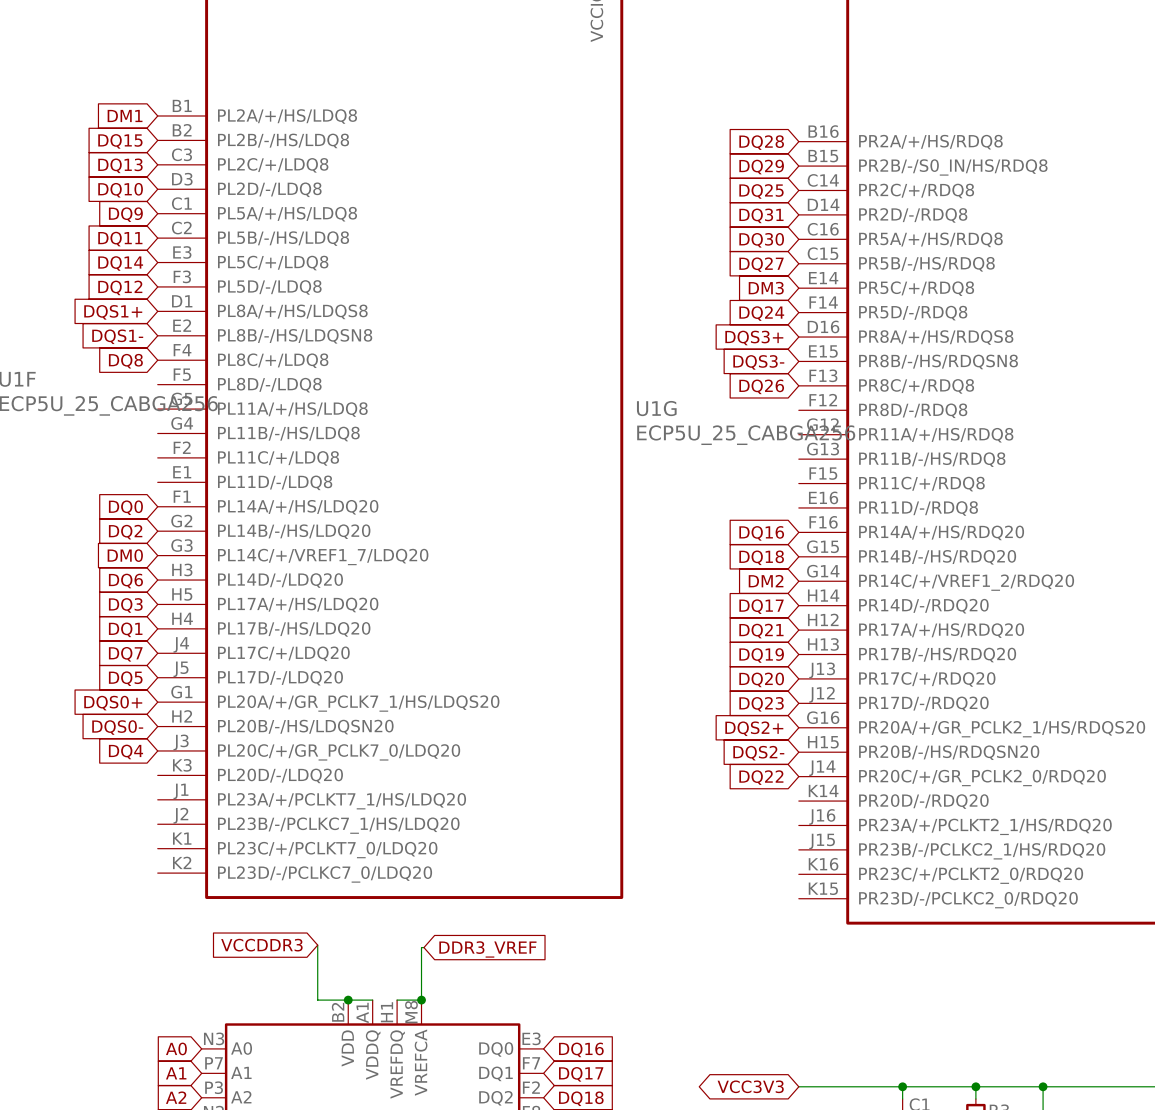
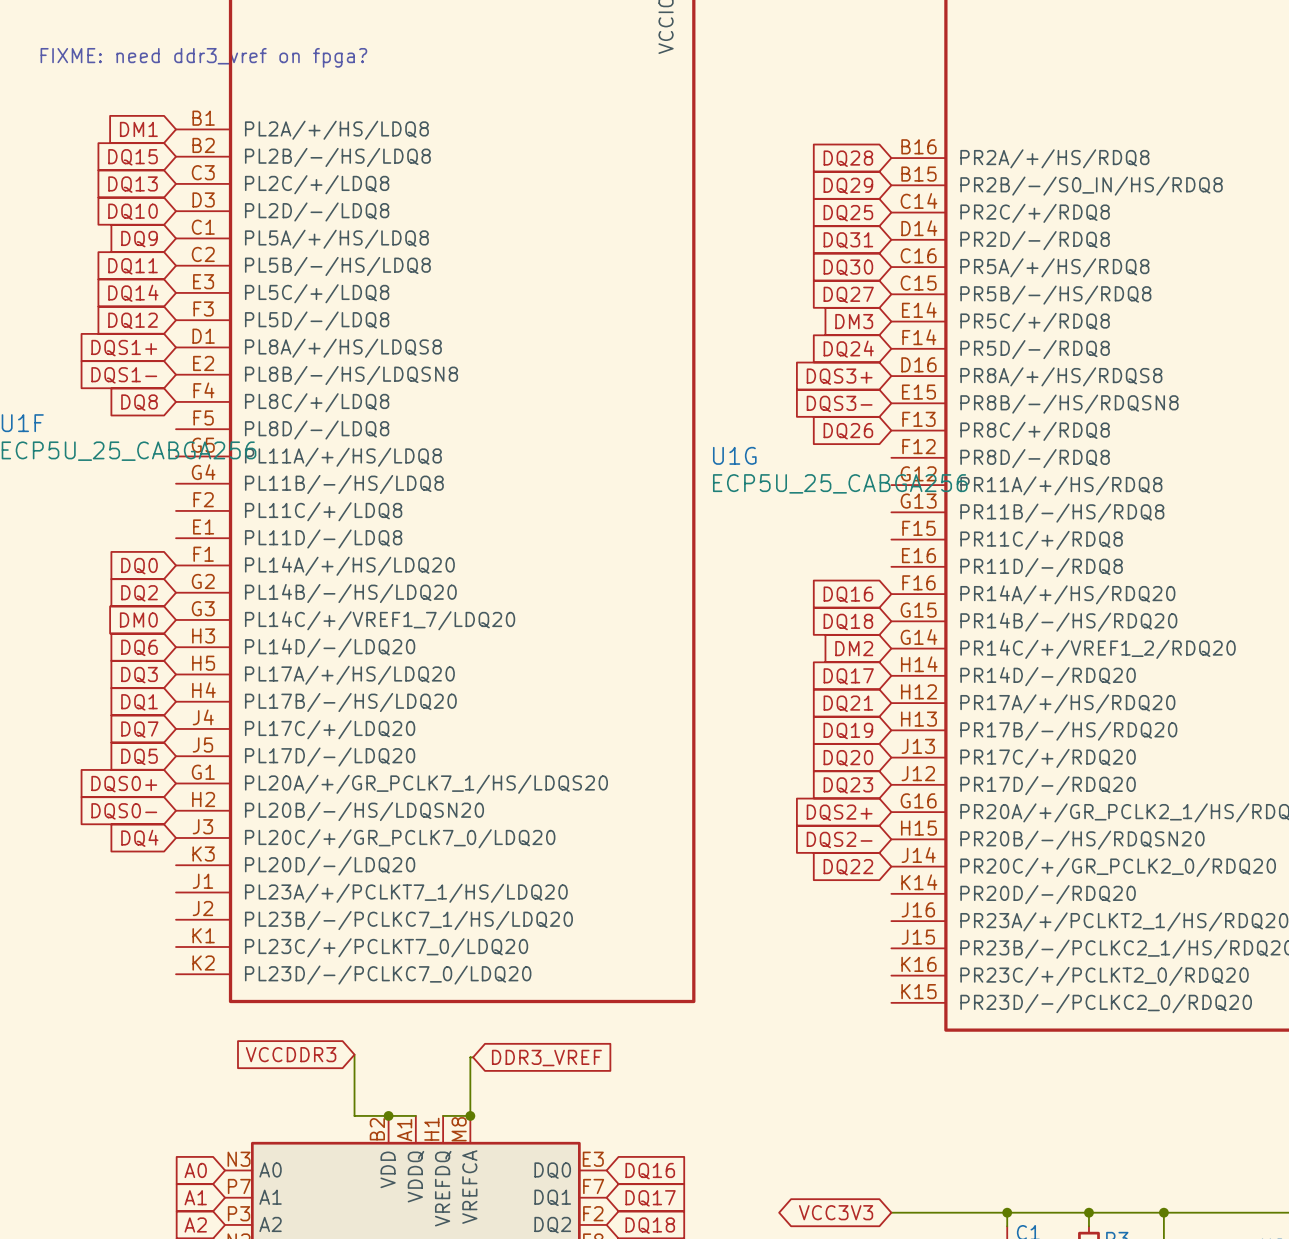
text: none -> FIXME: need ddr3_vref on fpga? (203, 57)

